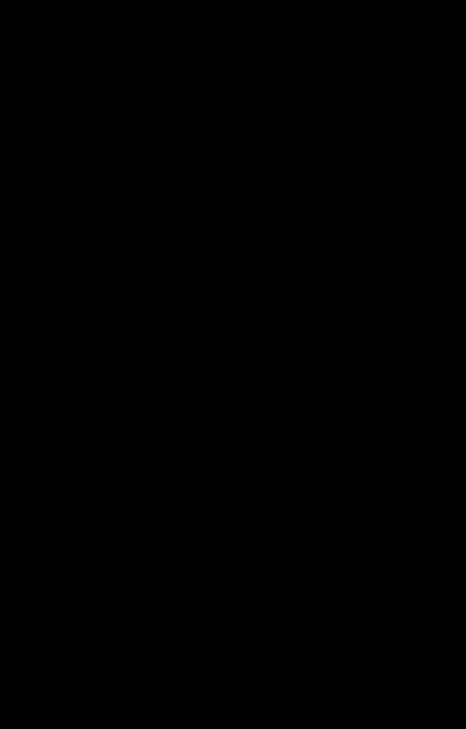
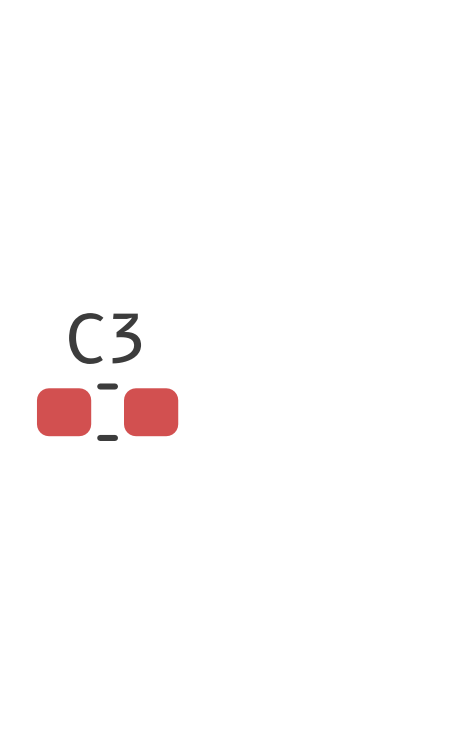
C3: none -> (107, 412)

